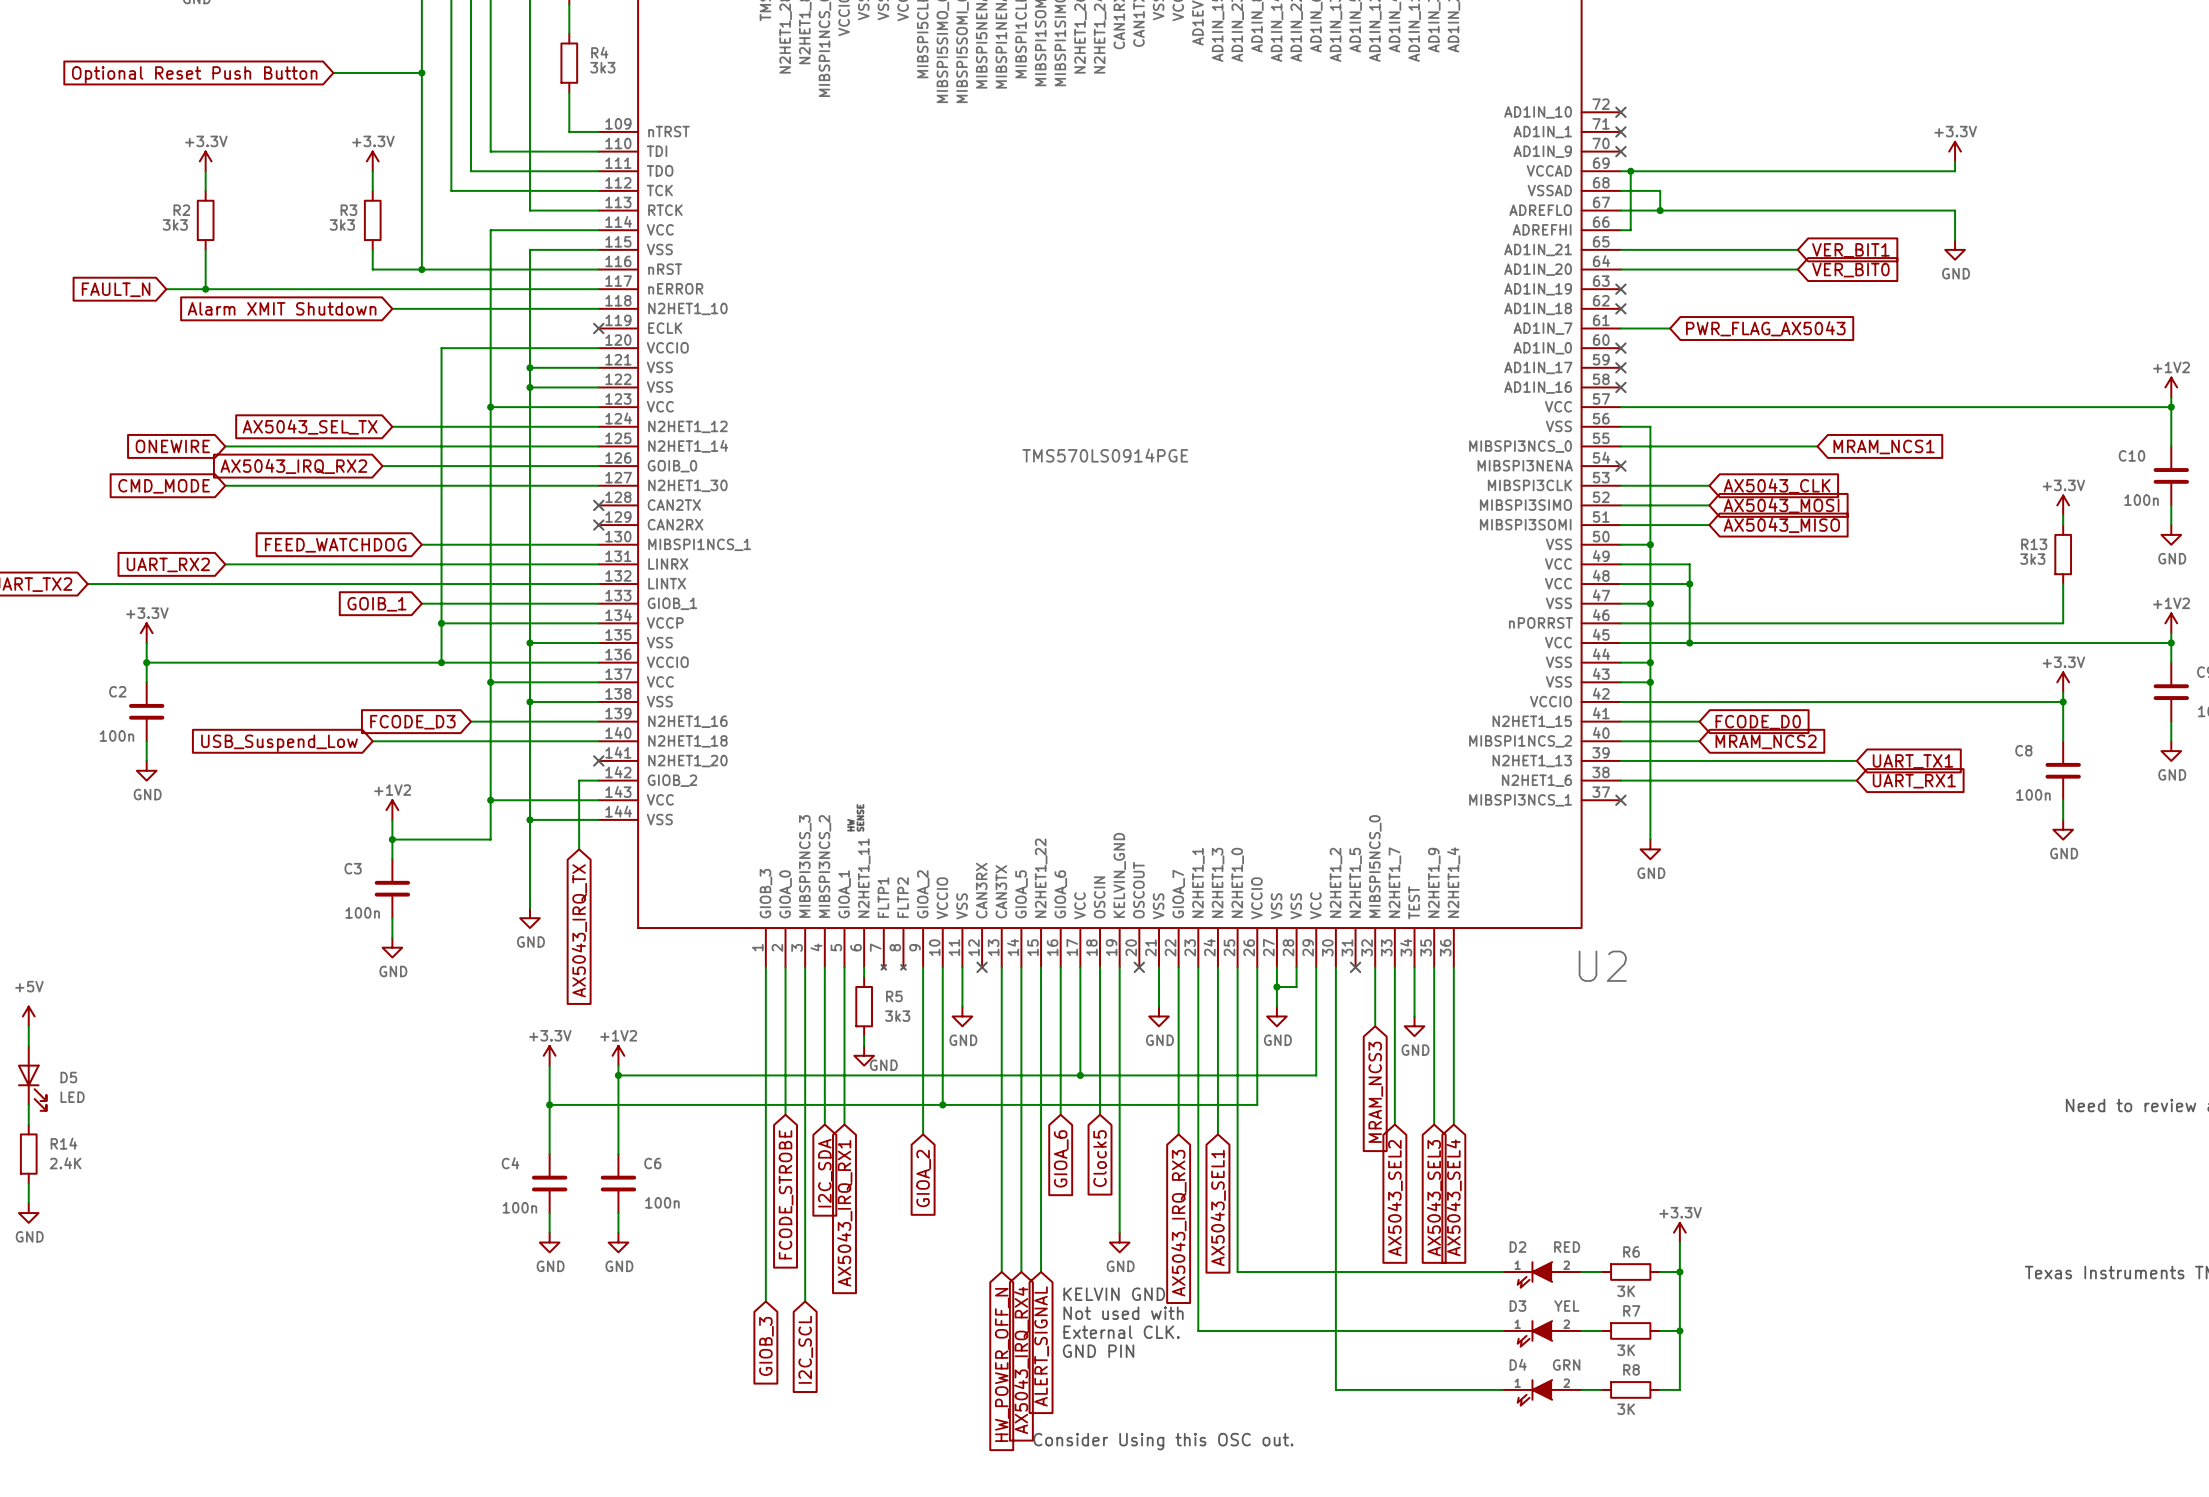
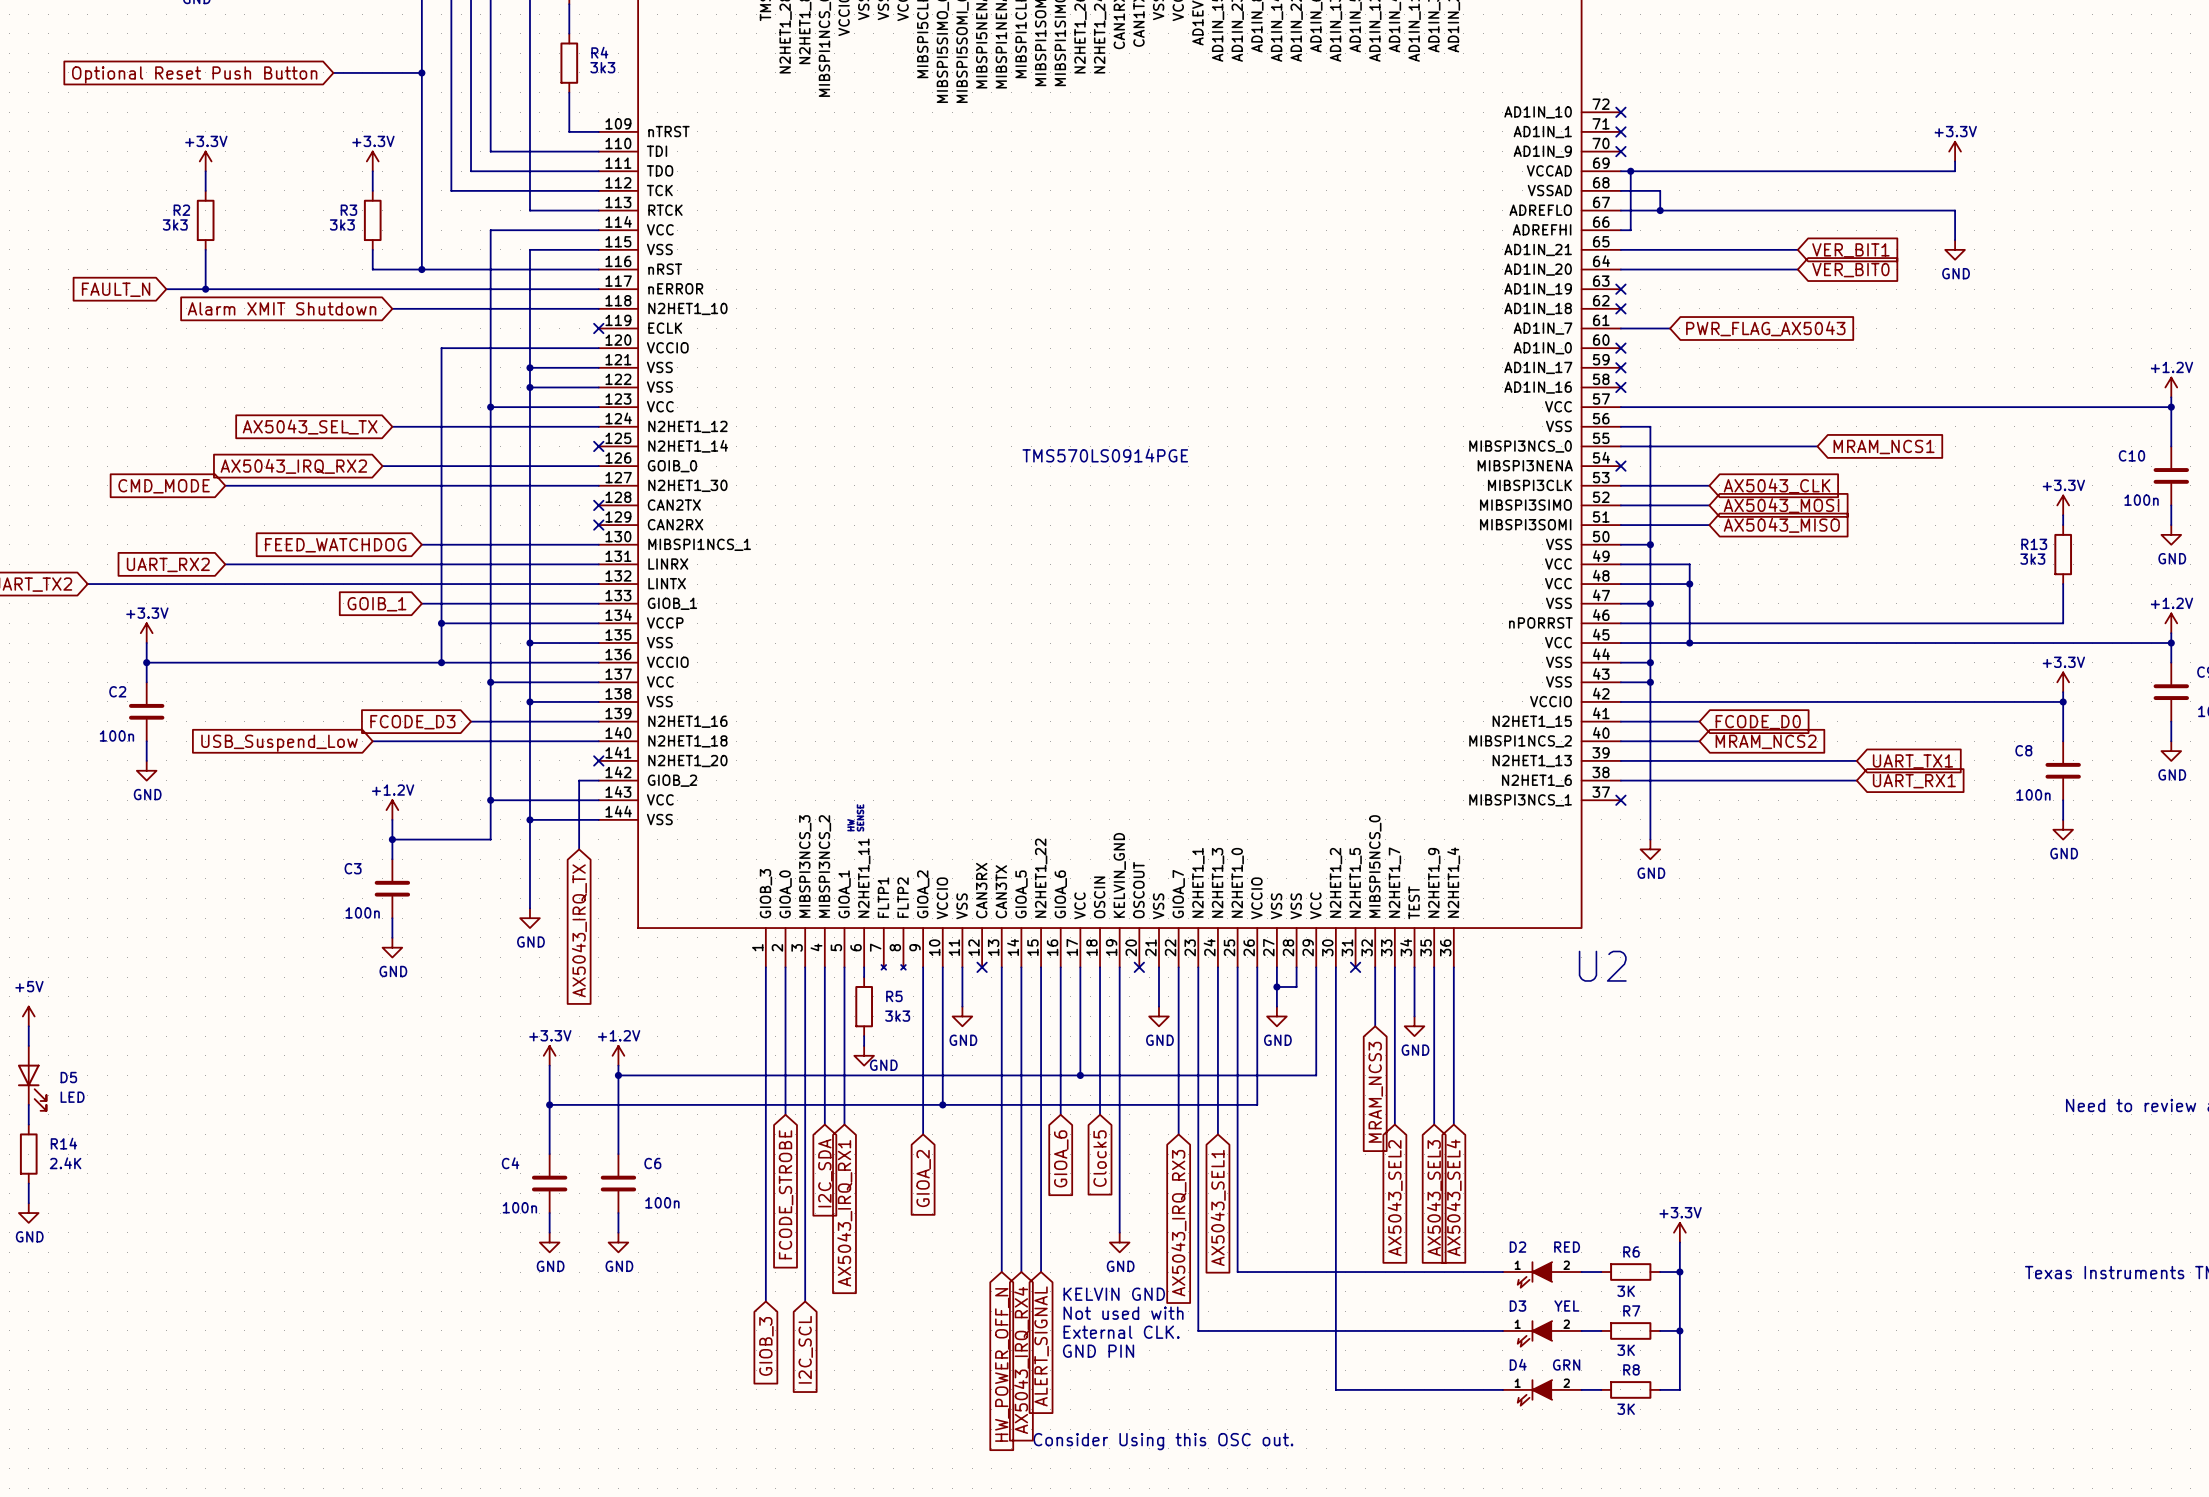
power symbol: +1V2 (2171, 387) -> +1.2V (2171, 387)
global label: ONEWIRE (172, 446) -> none
wire: (225, 446) (598, 446) -> none
no-connect mark: none -> (598, 446)
power symbol: +1V2 (2171, 623) -> +1.2V (2171, 623)
power symbol: +1V2 (392, 810) -> +1.2V (392, 810)
power symbol: +1V2 (618, 1055) -> +1.2V (618, 1055)

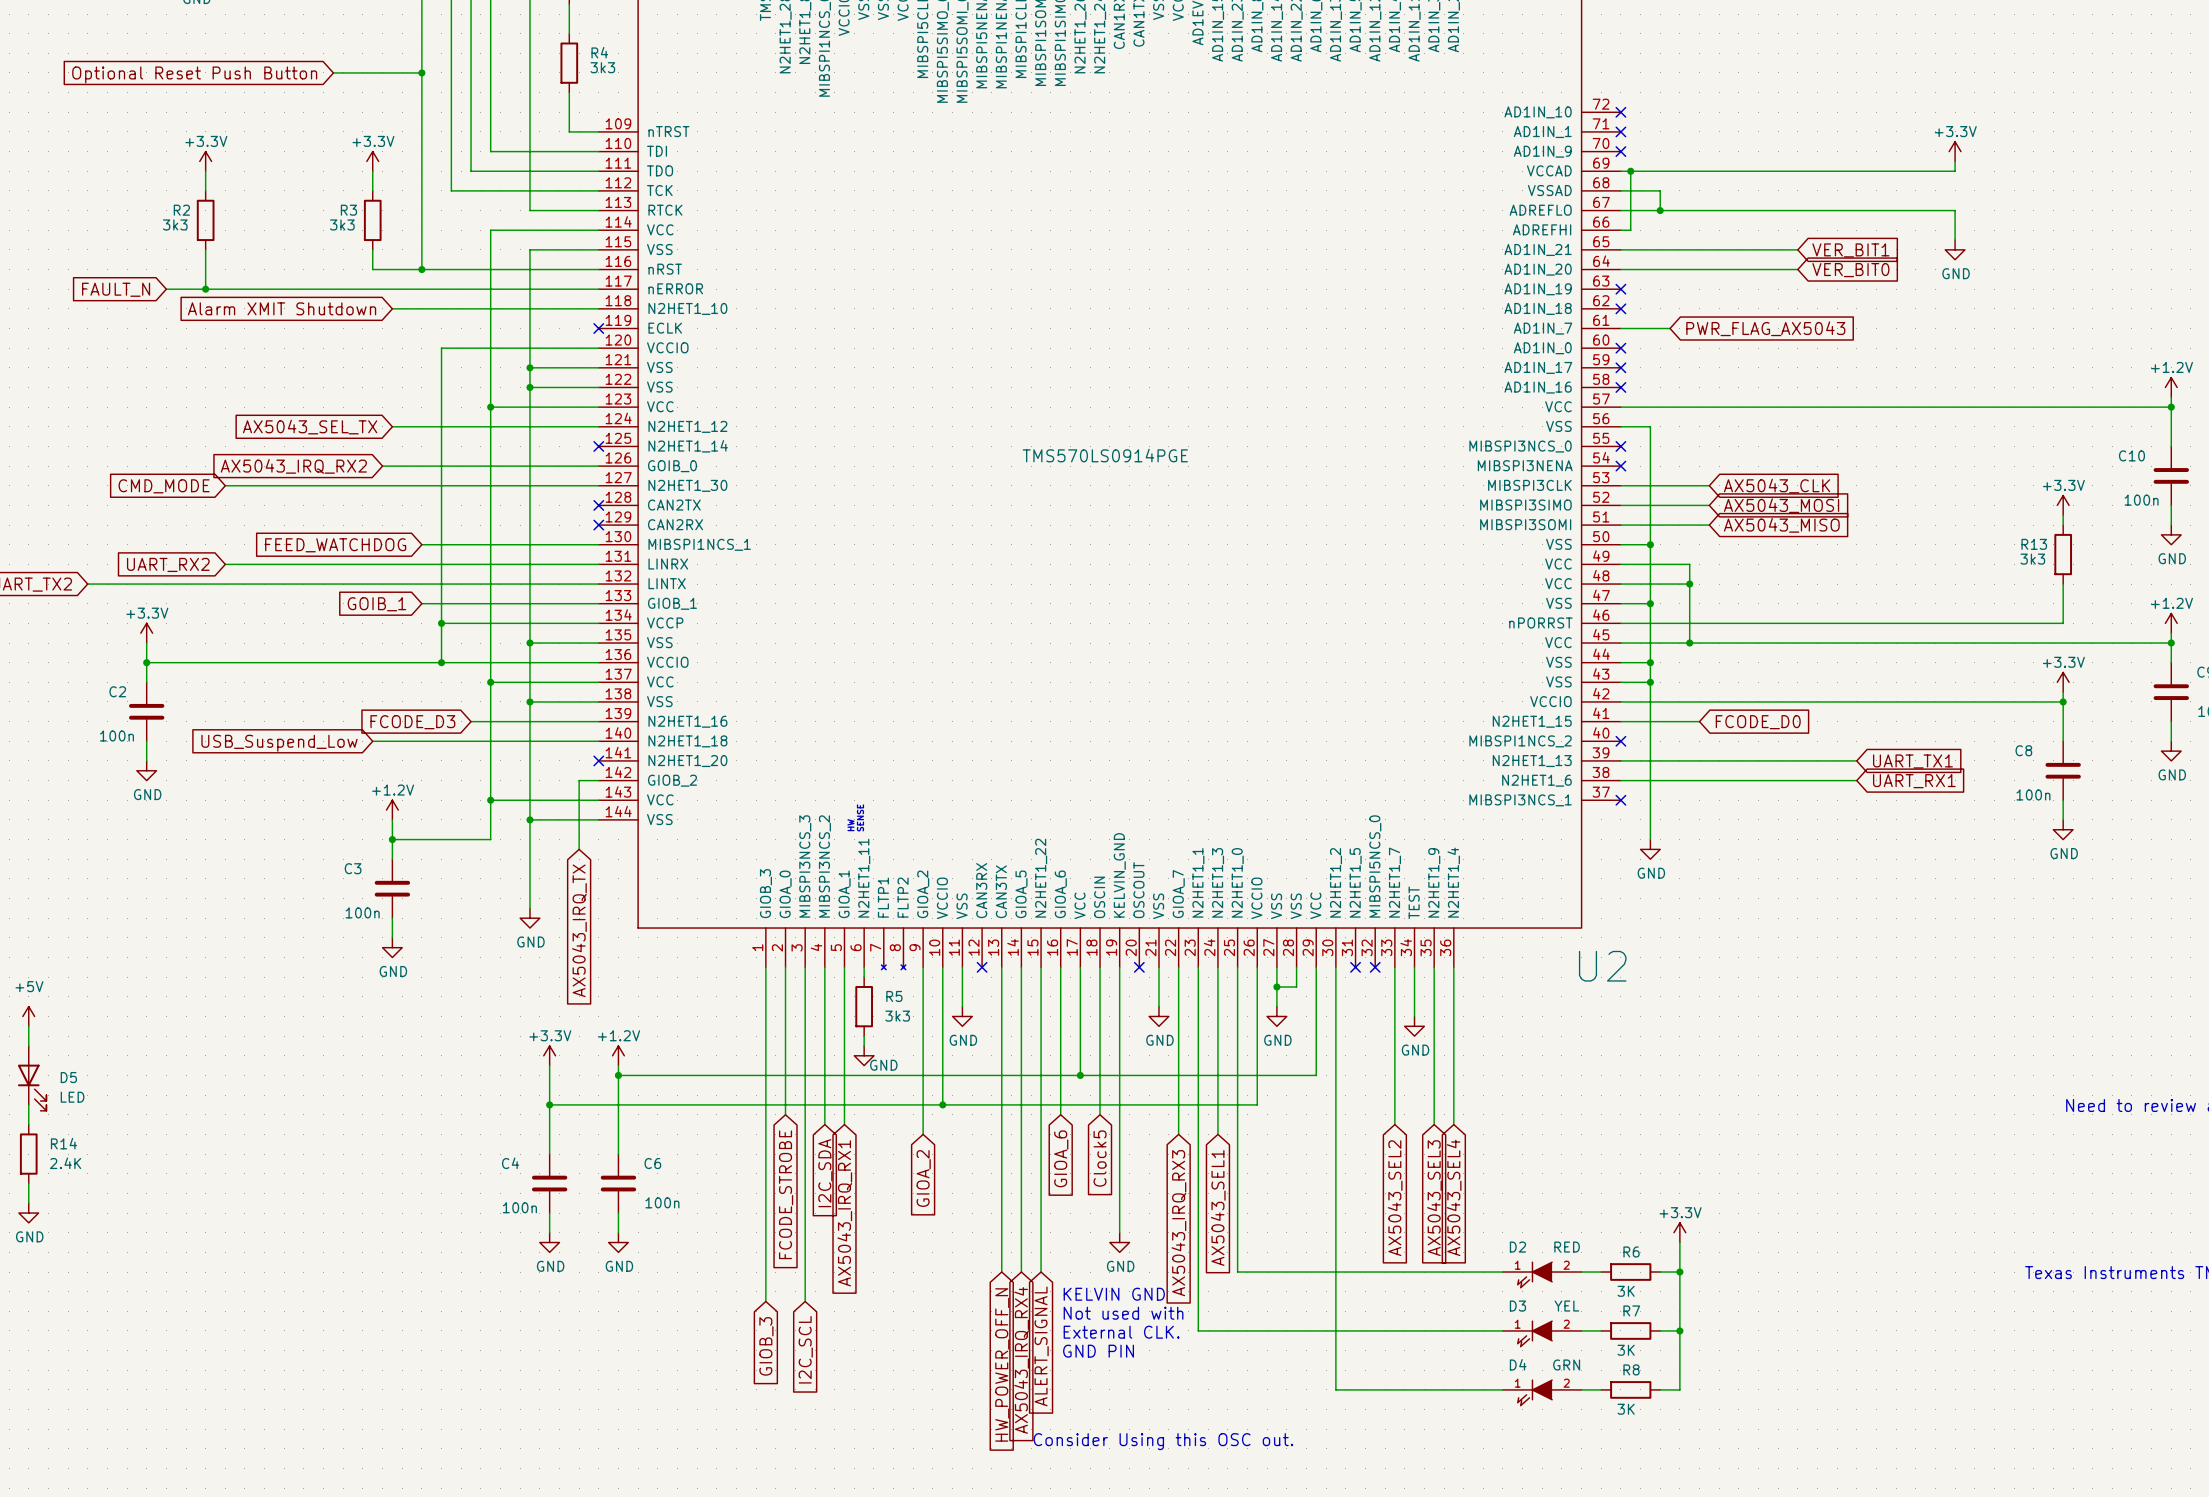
wire: (1620, 446) (1817, 446) -> none
no-connect mark: none -> (1620, 446)
global label: MRAM_NCS1 (1884, 447) -> none
wire: (1620, 741) (1699, 741) -> none
no-connect mark: none -> (1620, 741)
global label: MRAM_NCS2 (1766, 741) -> none
wire: (1375, 967) (1375, 1026) -> none
no-connect mark: none -> (1375, 967)
global label: MRAM_NCS3 (1375, 1092) -> none

